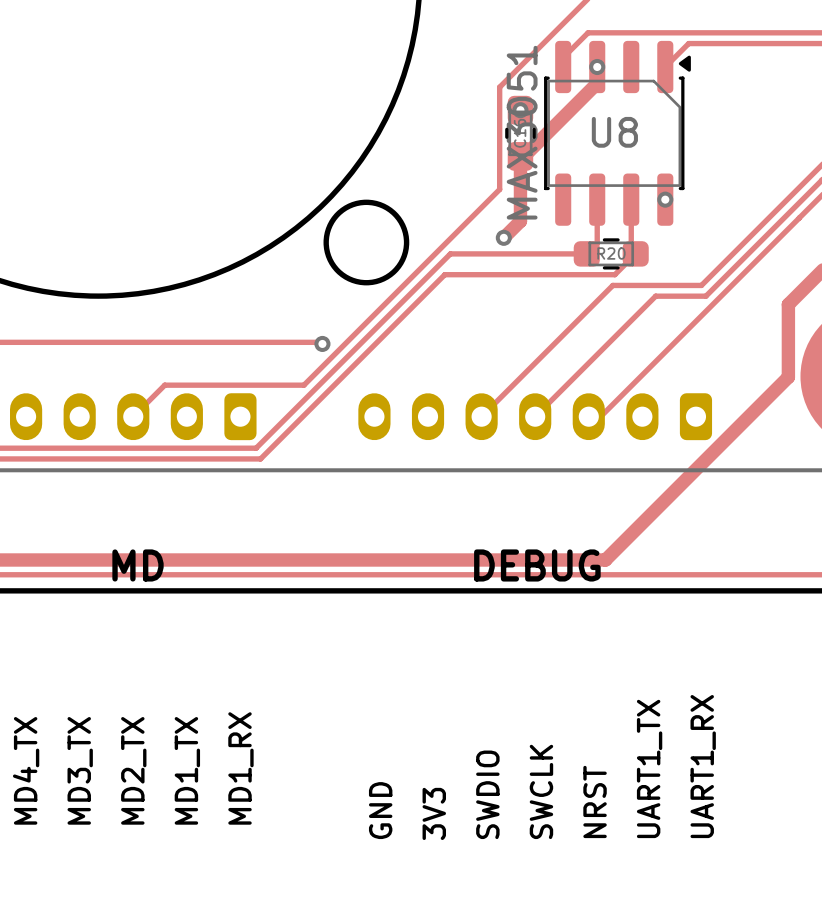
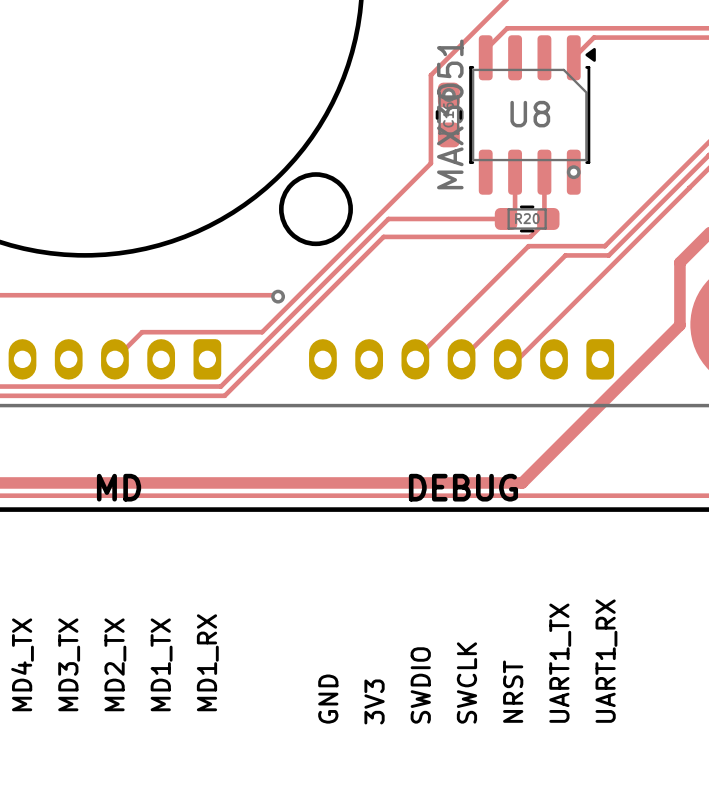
track: (597, 67) (597, 83) (524, 156) (520, 156) (520, 221) (503, 237) -> none
via: (597, 67) -> none
via: (503, 237) -> none

